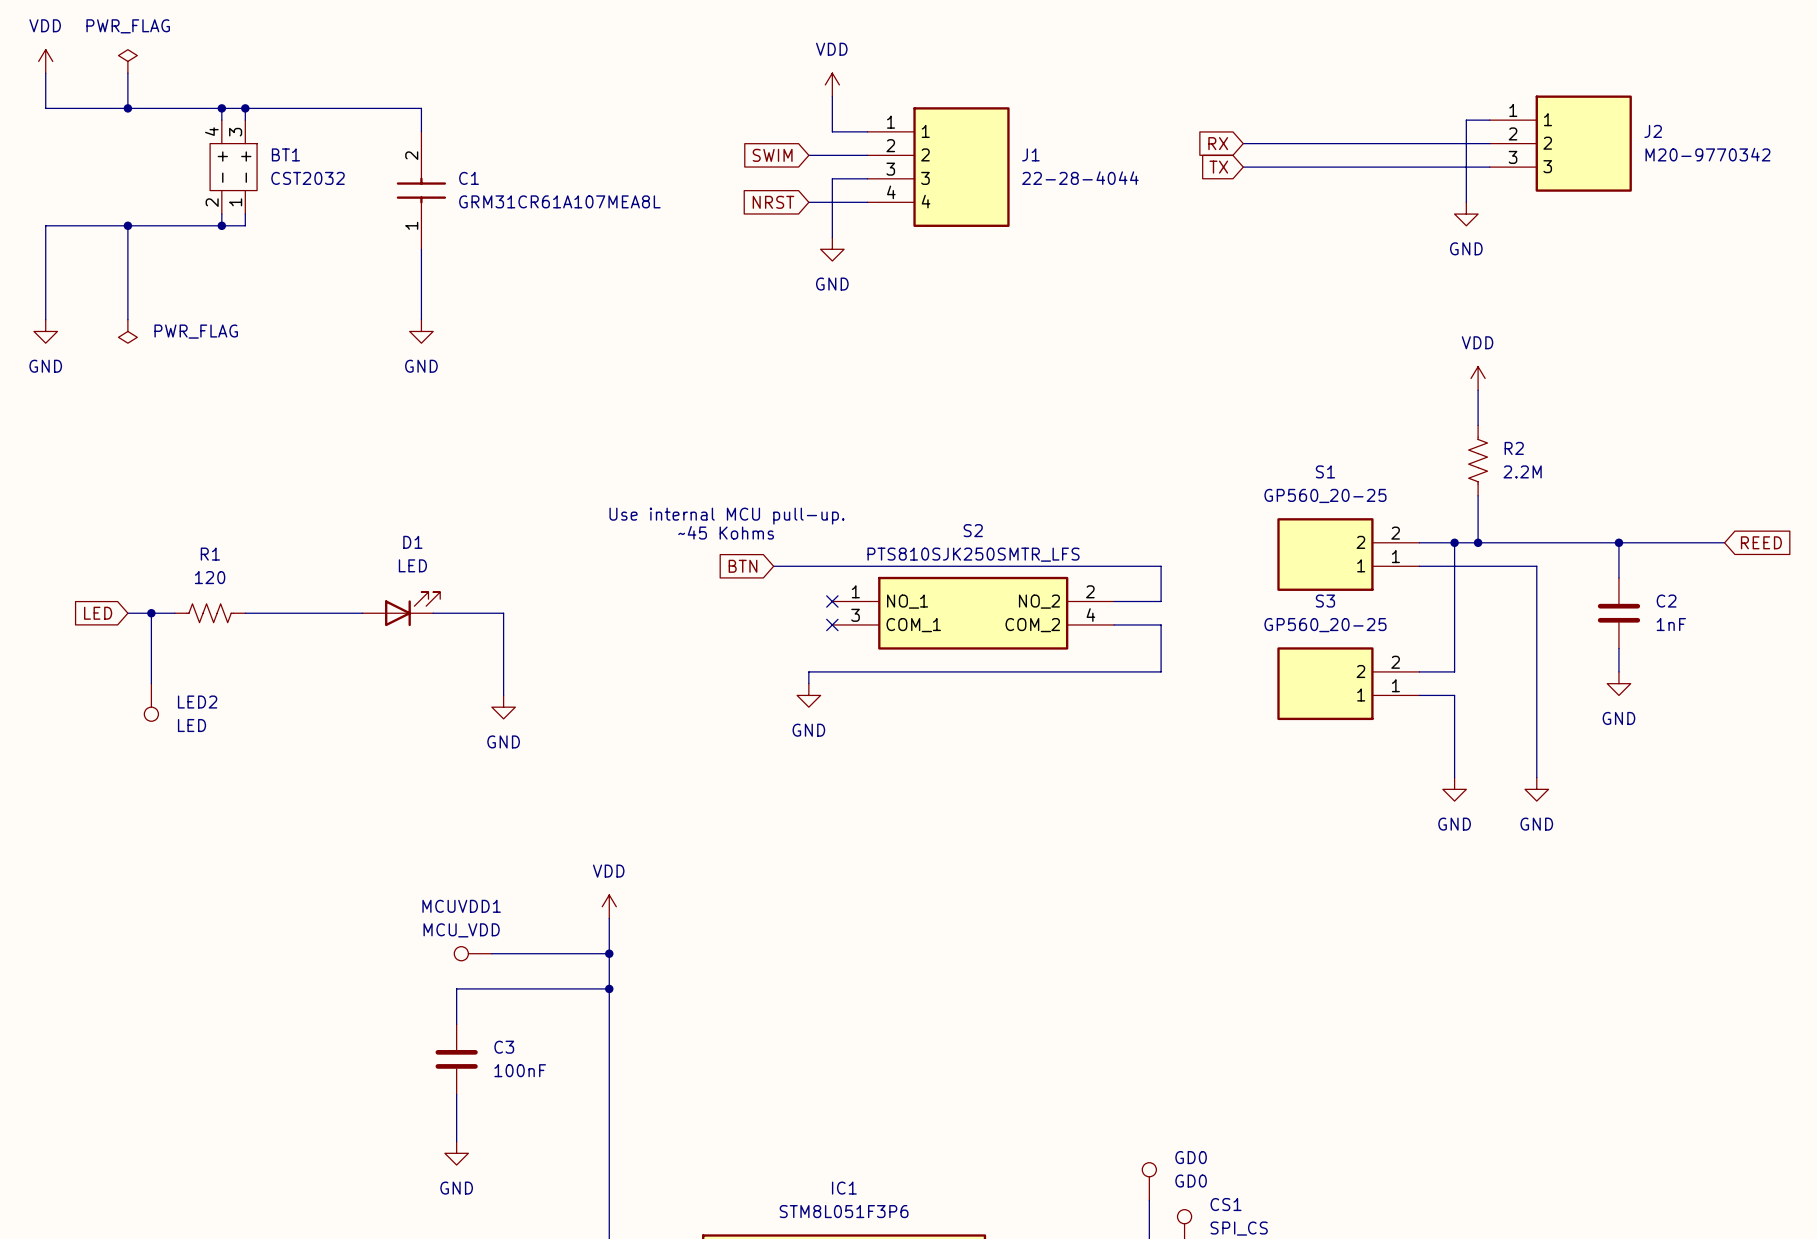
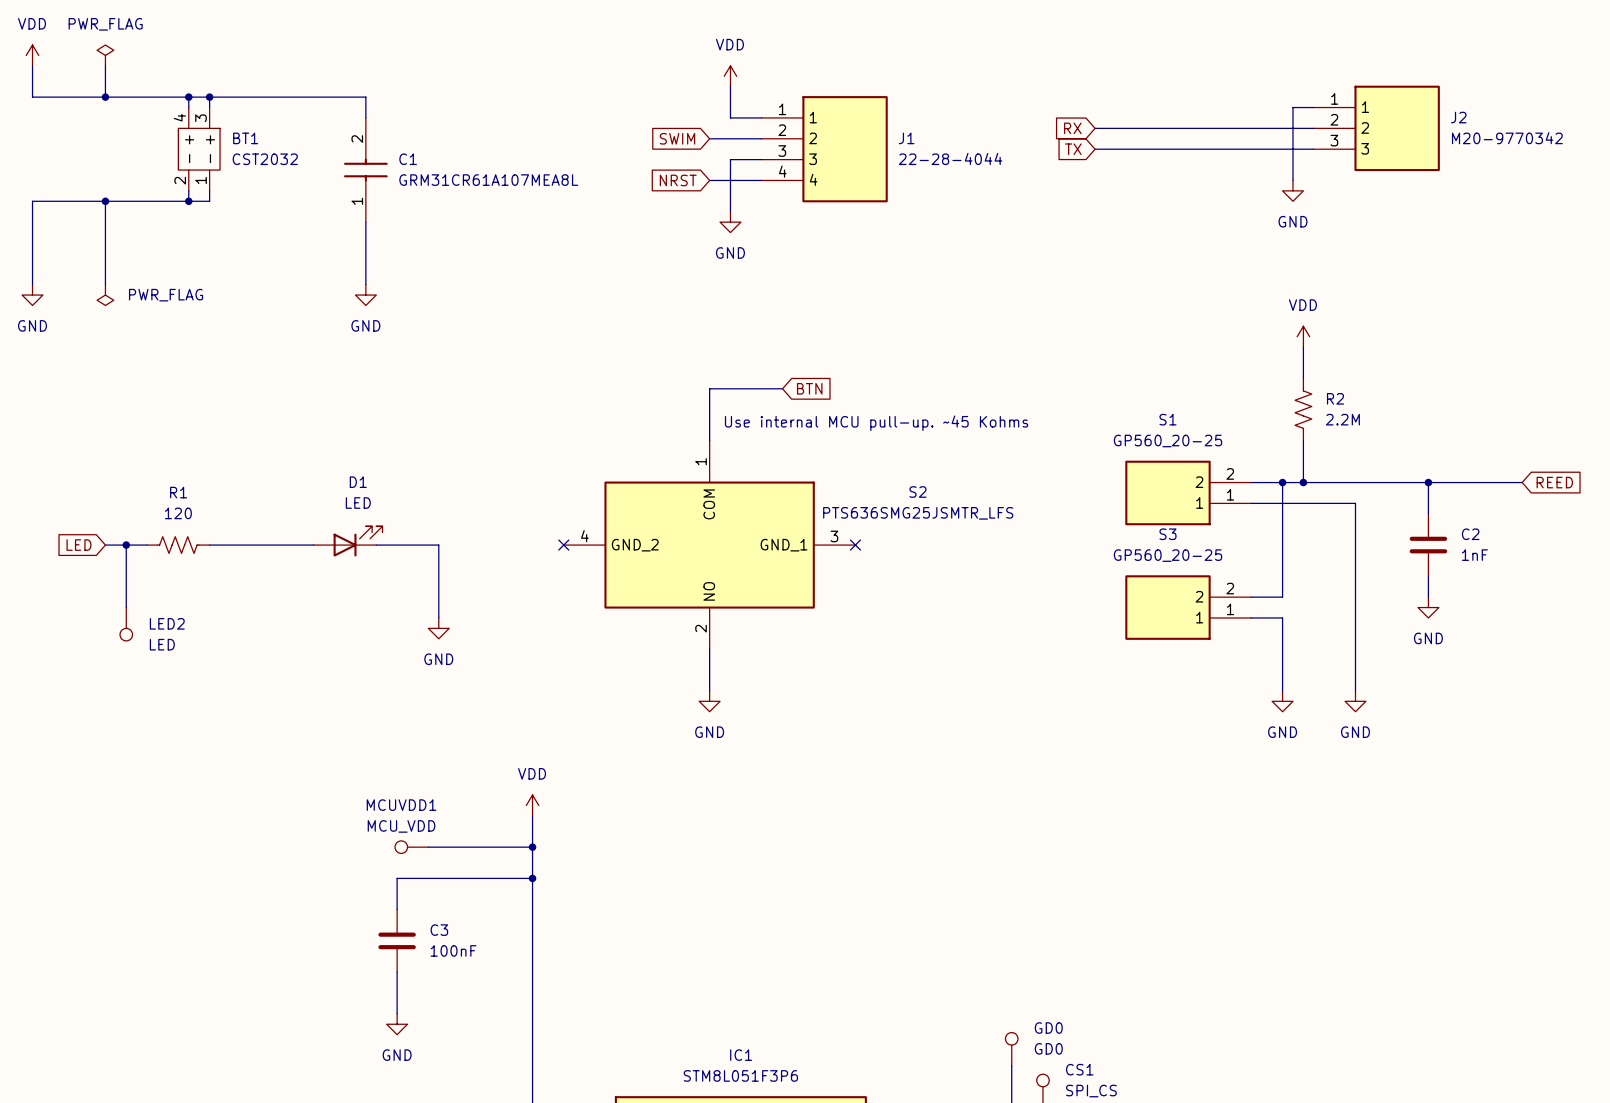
wire: none -> (782, 388) (709, 388) (709, 440)
text: none -> Use internal MCU pull-up. ~45 Kohms (876, 423)
text: Use internal MCU pull-up. (726, 516) -> none
S2 name position: S2 (973, 530) -> S2 (917, 492)
text: ~45 Kohms (726, 532) -> none
S2 value: PTS810SJK250SMTR_LFS (973, 554) -> PTS636SMG25JSMTR_LFS (918, 513)
global label rotation: 0° (743, 566) -> 180° (809, 388)
global label position: BTN (743, 566) -> BTN (809, 388)
wire: (773, 566) (1161, 566) (1161, 601) (1114, 601) -> none
S2 symbol: [832, 576, 1115, 650] -> [563, 440, 856, 650]
no-connect mark: (832, 601) -> none
no-connect mark: none -> (563, 545)
no-connect mark: none -> (855, 545)
no-connect mark: (832, 624) -> none
wire: (1114, 624) (1161, 624) (1161, 671) (808, 671) (808, 683) -> none
power symbol position: GND (808, 695) -> GND (709, 701)
wire: none -> (709, 649) (709, 690)

